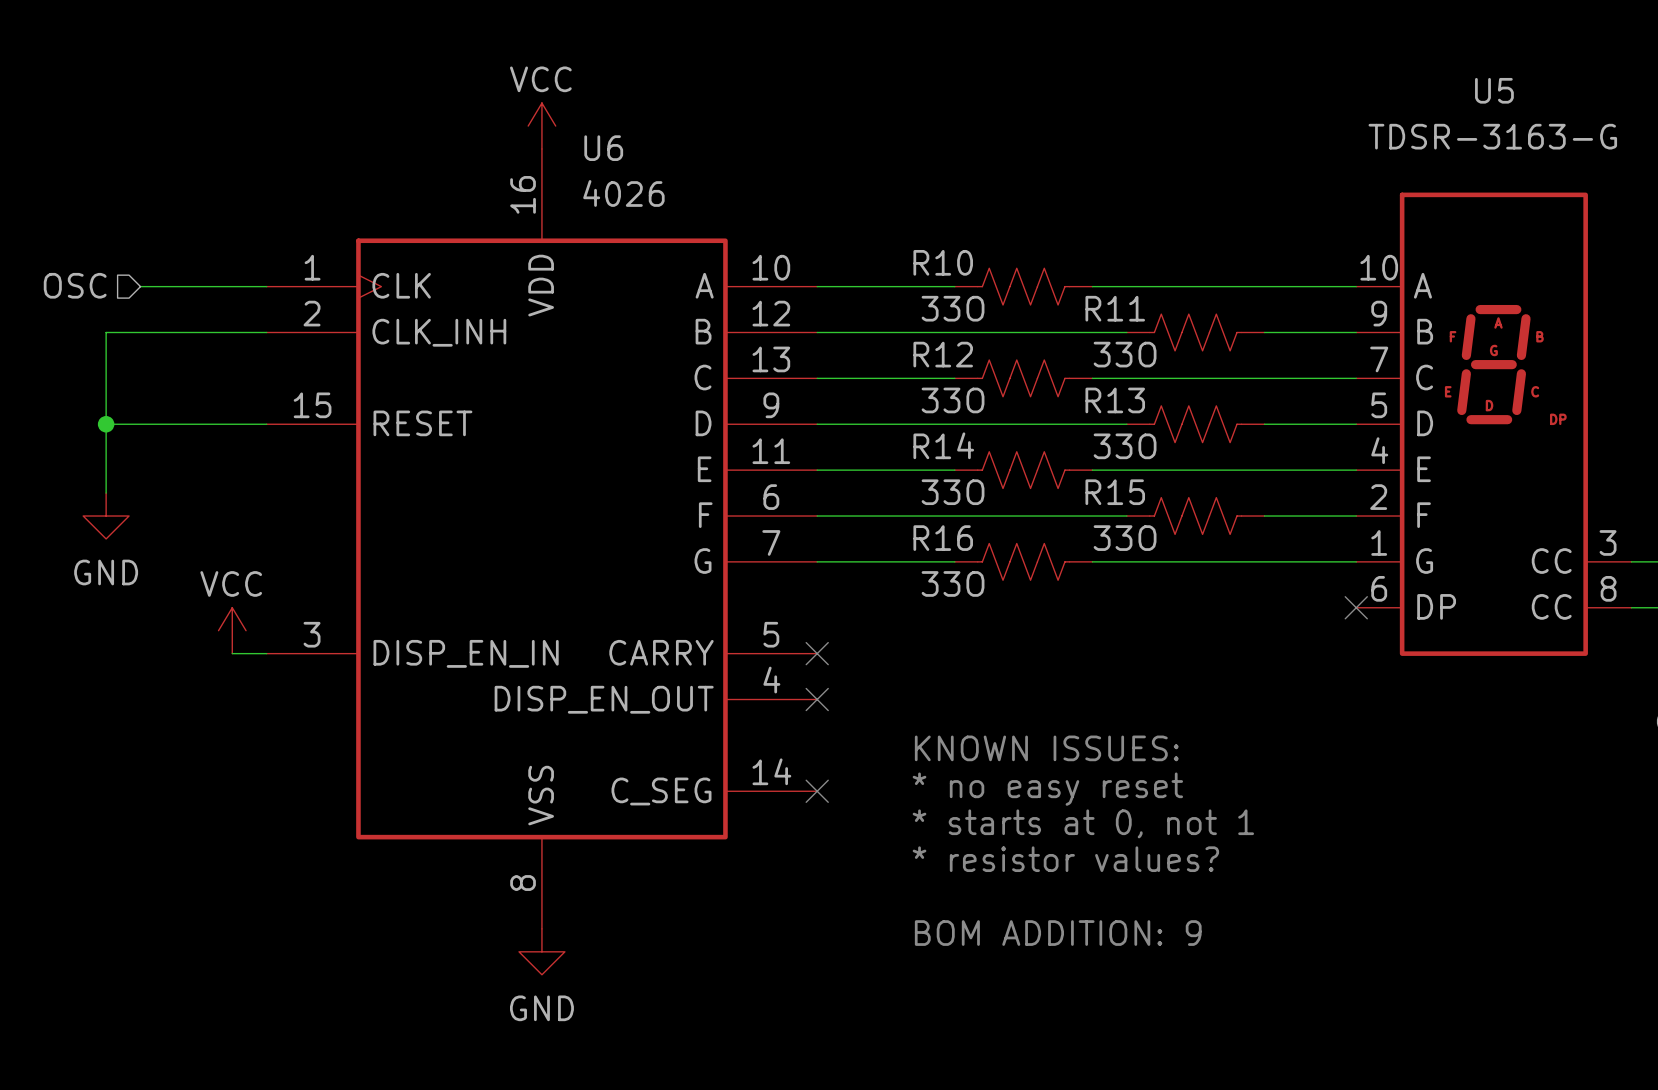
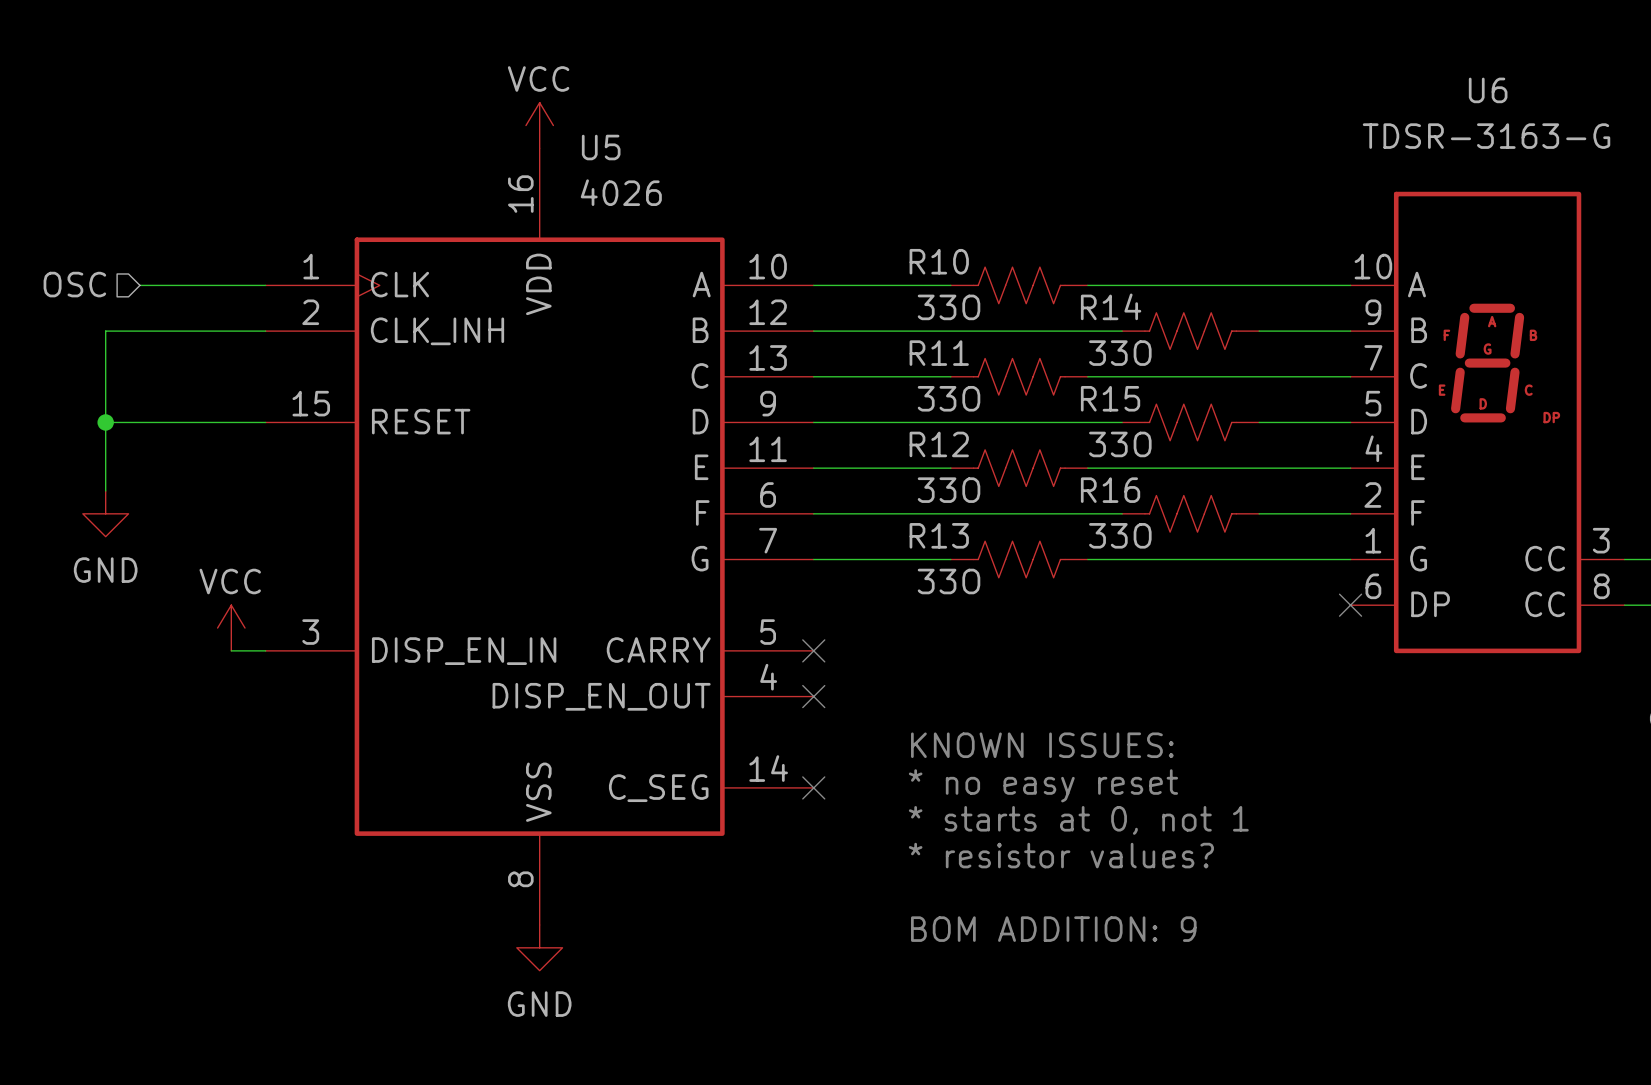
U5 name: U5 (1494, 90) -> U6 (1488, 90)
U6 name: U6 (603, 148) -> U5 (601, 147)
R11 name: R11 (1115, 308) -> R14 (1111, 306)
R12 name: R12 (943, 354) -> R11 (939, 353)
R13 name: R13 (1115, 400) -> R15 (1110, 398)
R14 name: R14 (943, 445) -> R12 (939, 444)
R15 name: R15 (1115, 492) -> R16 (1110, 490)
R16 name: R16 (943, 538) -> R13 (939, 535)

